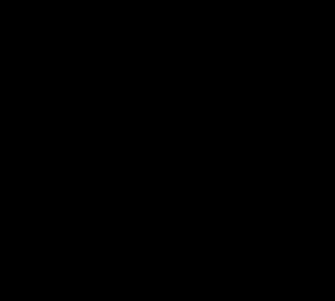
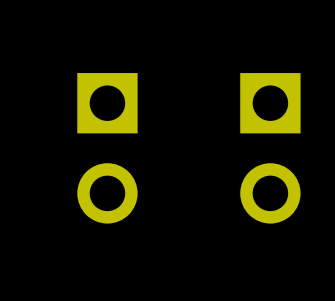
part: none -> (107, 148)
part: none -> (270, 148)

